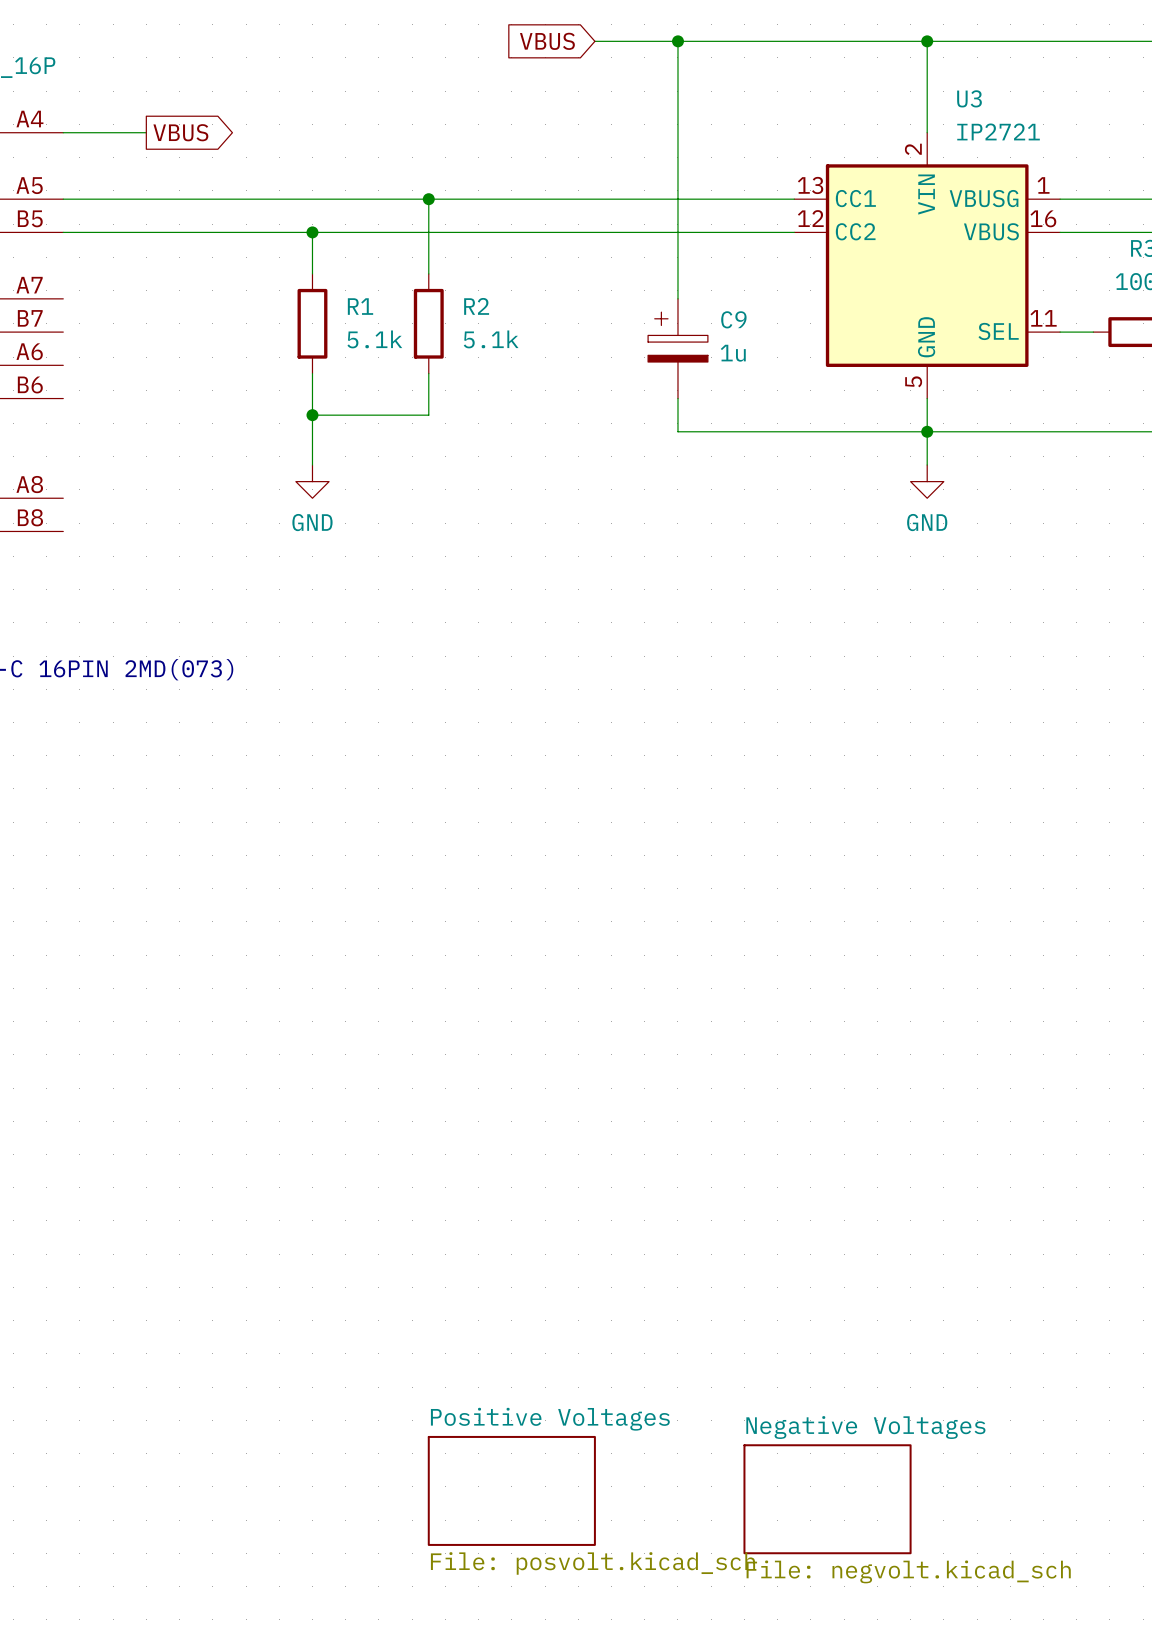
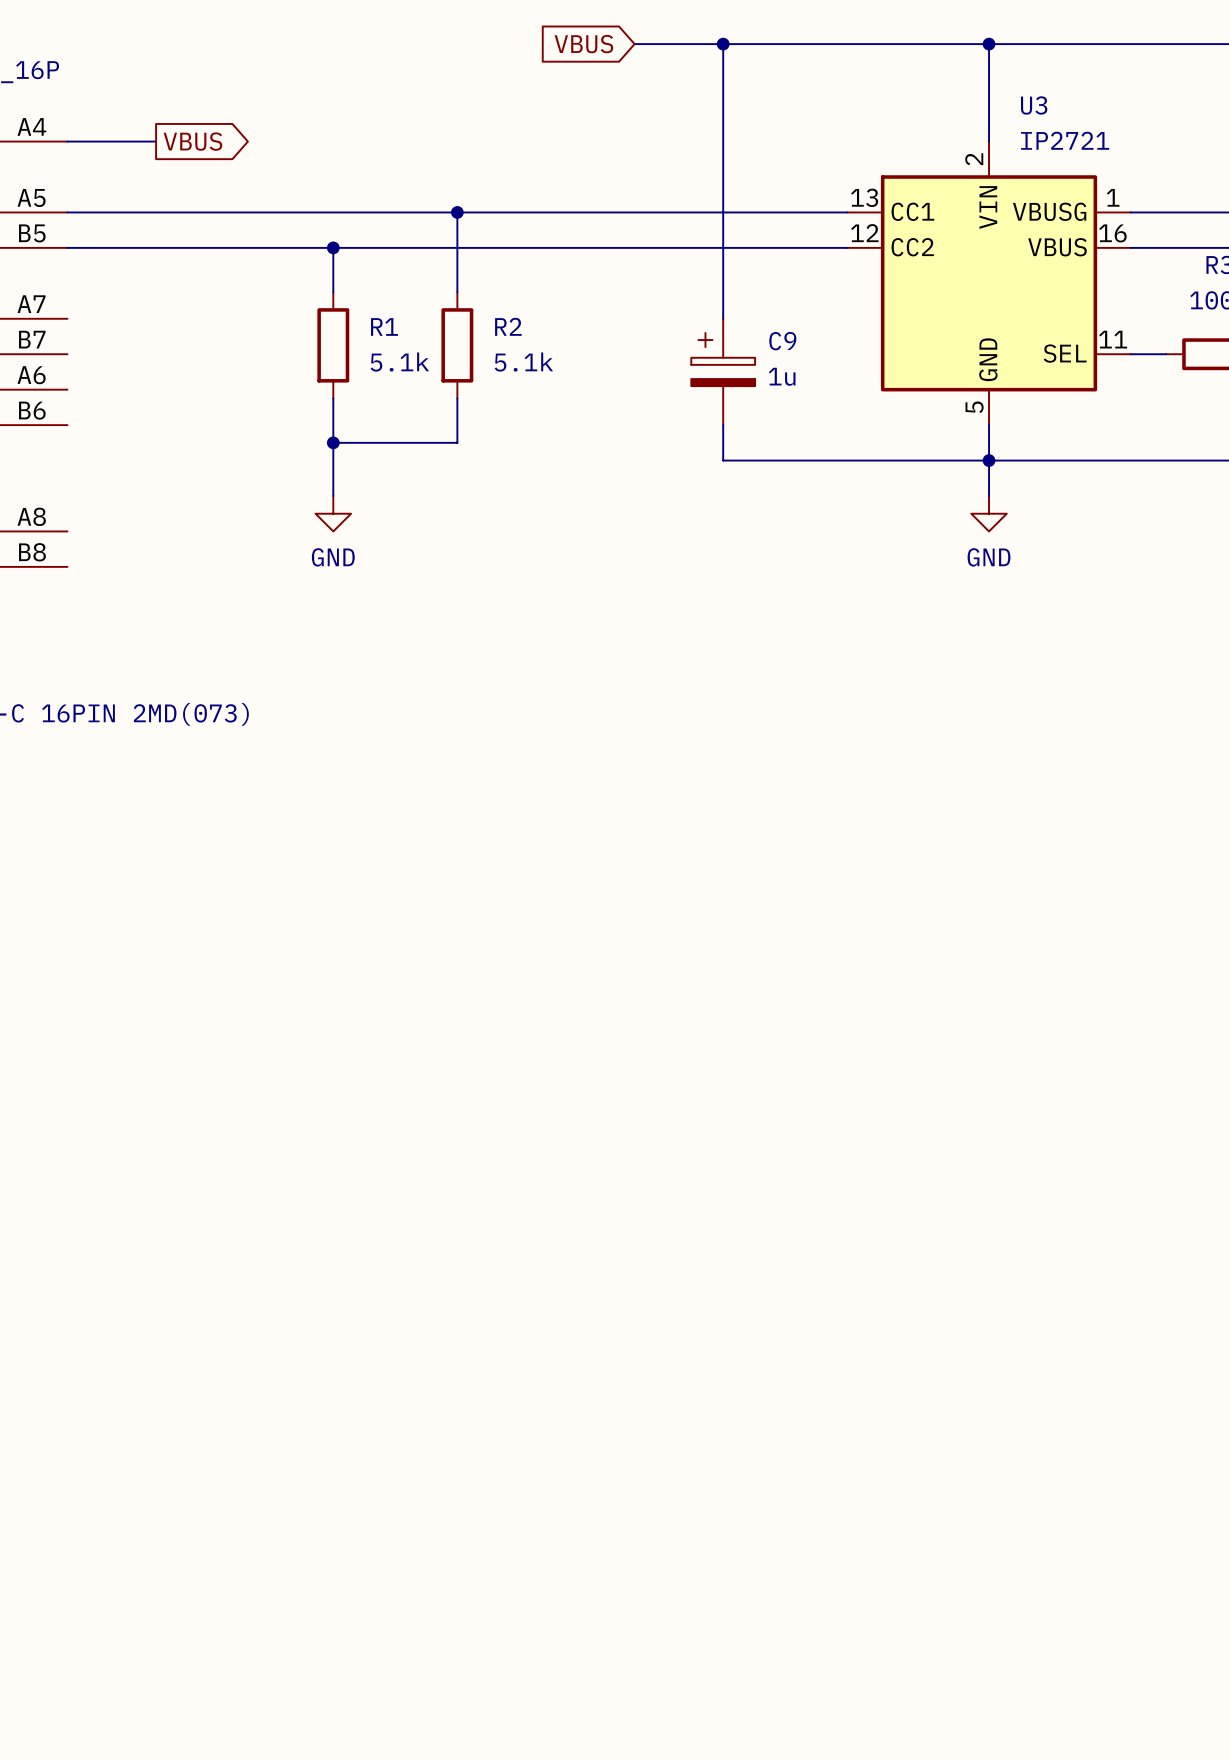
sheet Positive Voltages: File: posvolt.kicad_sch (511, 1490) -> none
sheet Negative Voltages: File: negvolt.kicad_sch (827, 1499) -> none

